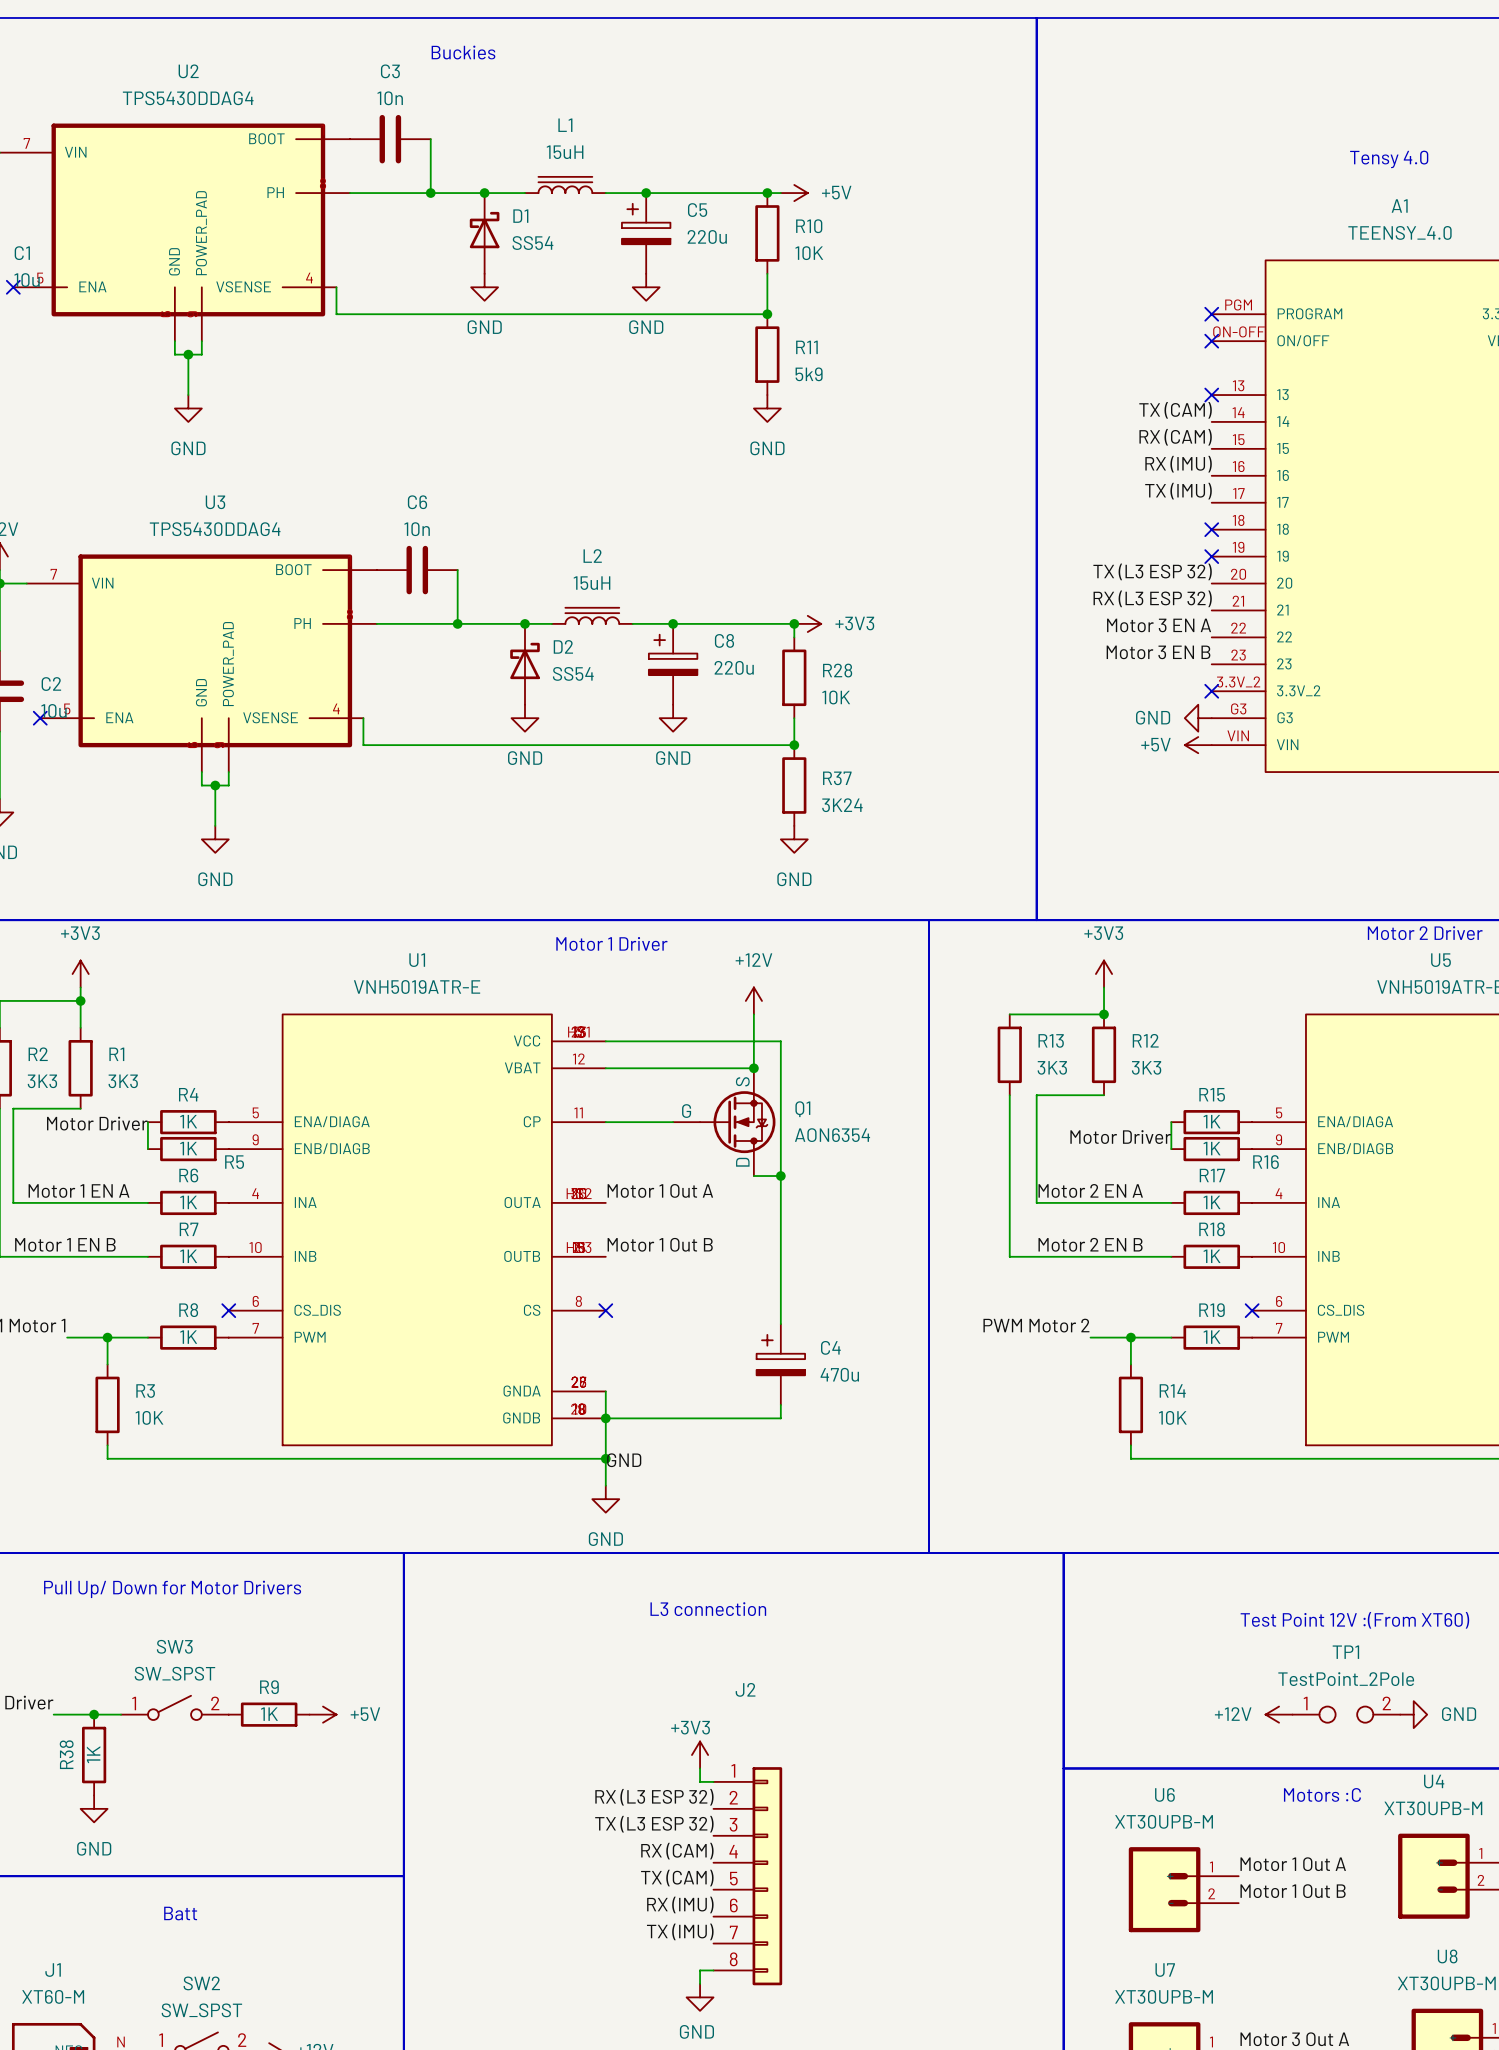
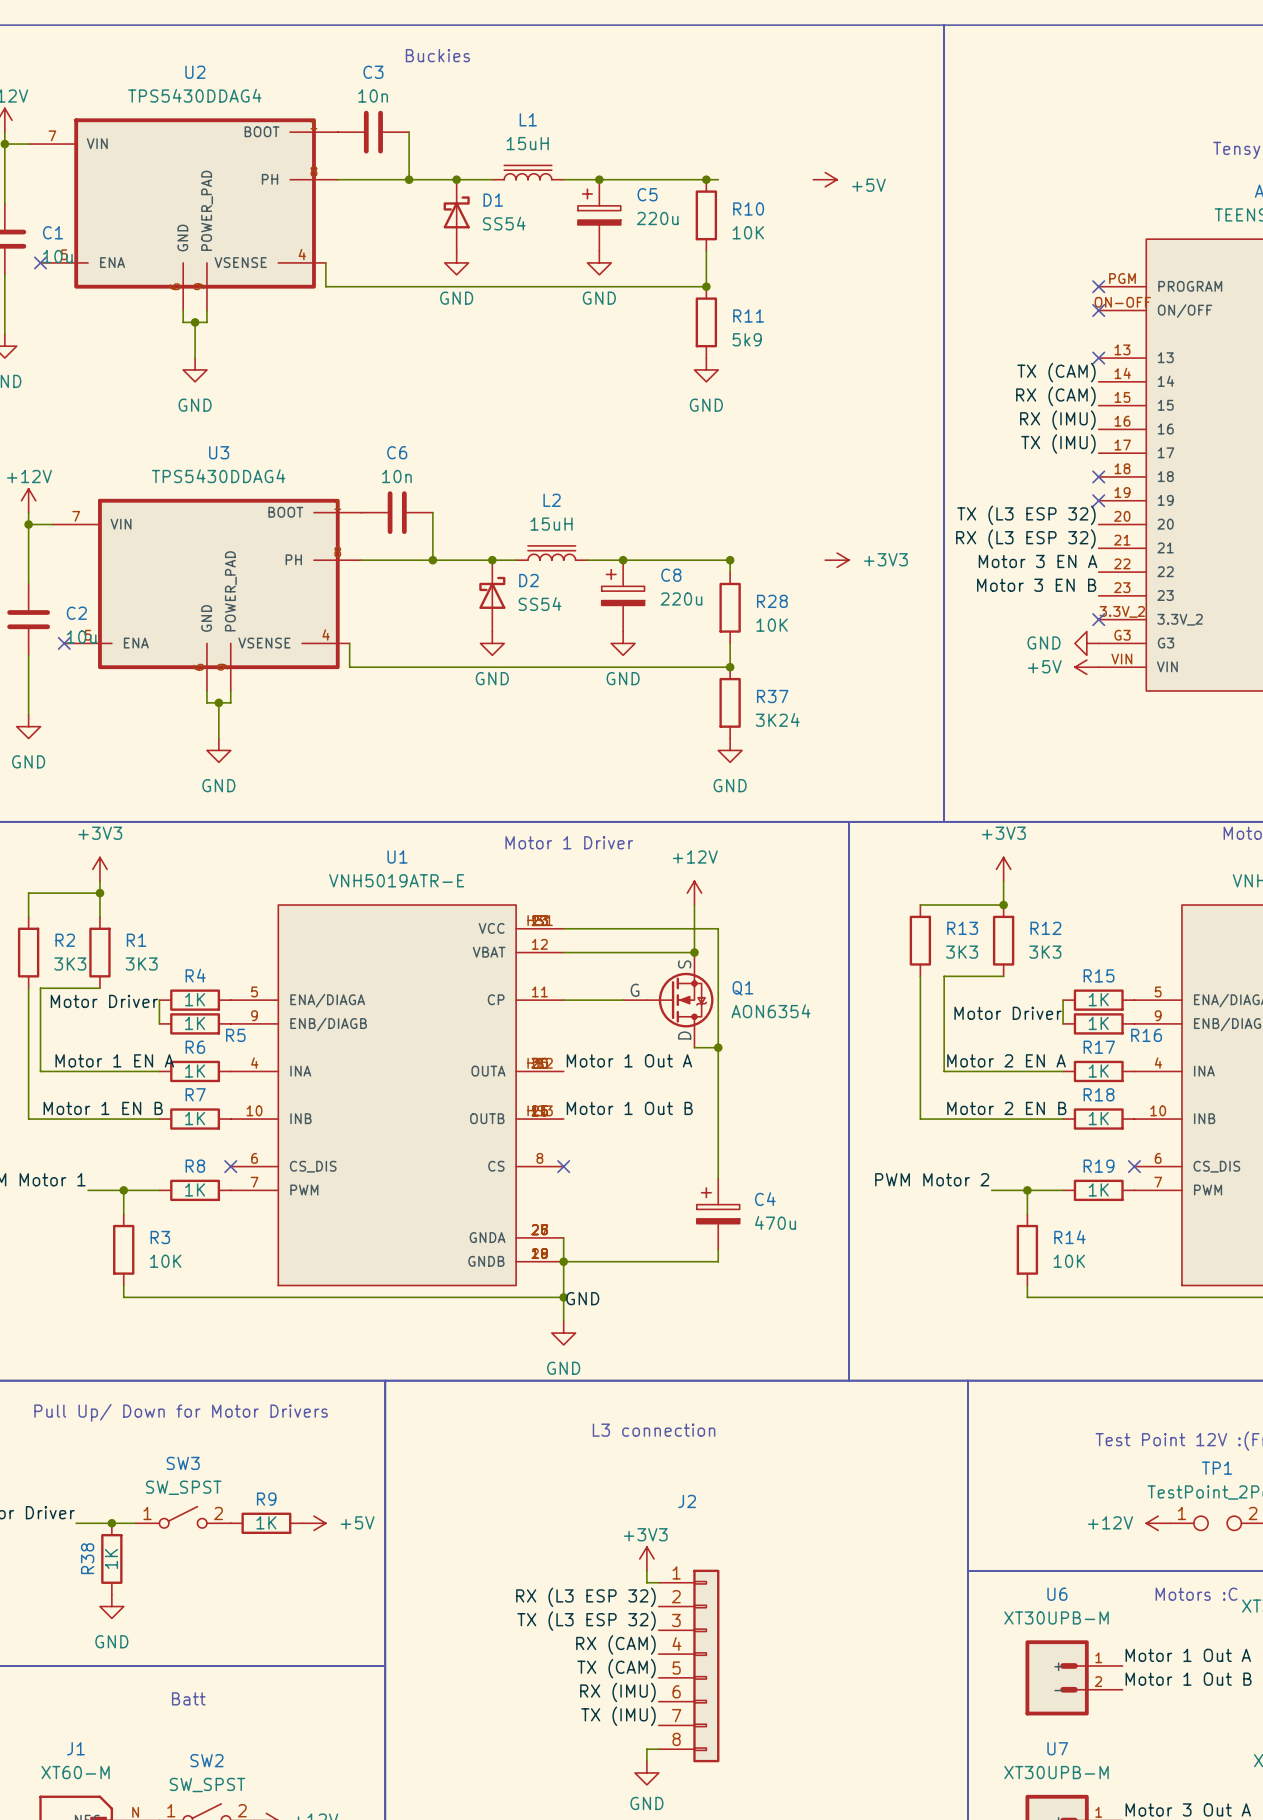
power symbol text position: +5V (836, 192) -> +5V (868, 185)
power symbol position: +5V (794, 193) -> +5V (825, 179)
power symbol position: +3V3 (807, 623) -> +3V3 (837, 560)

